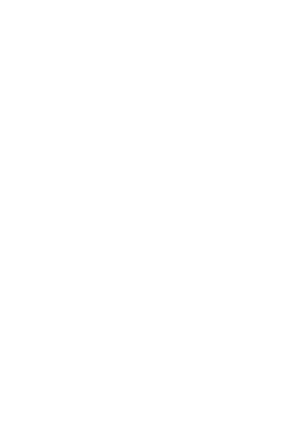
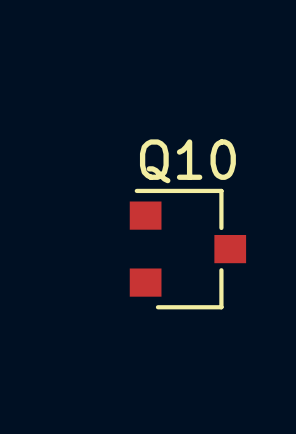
Q10: none -> (187, 249)

